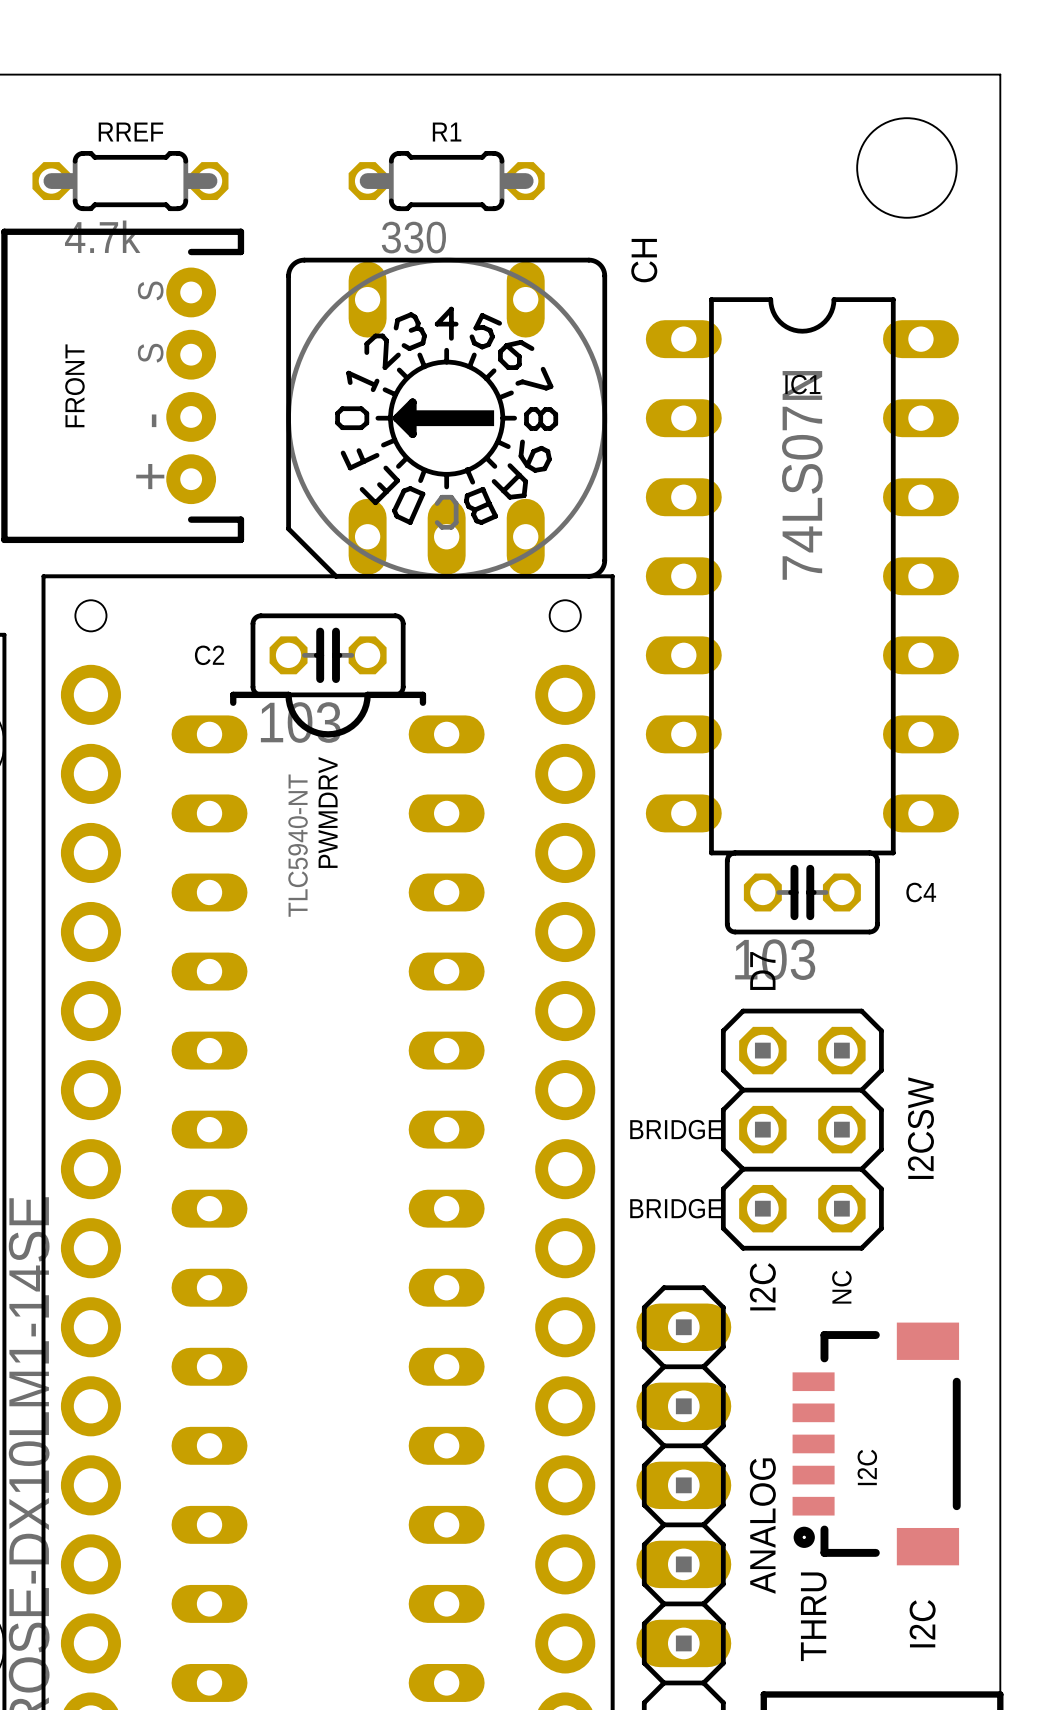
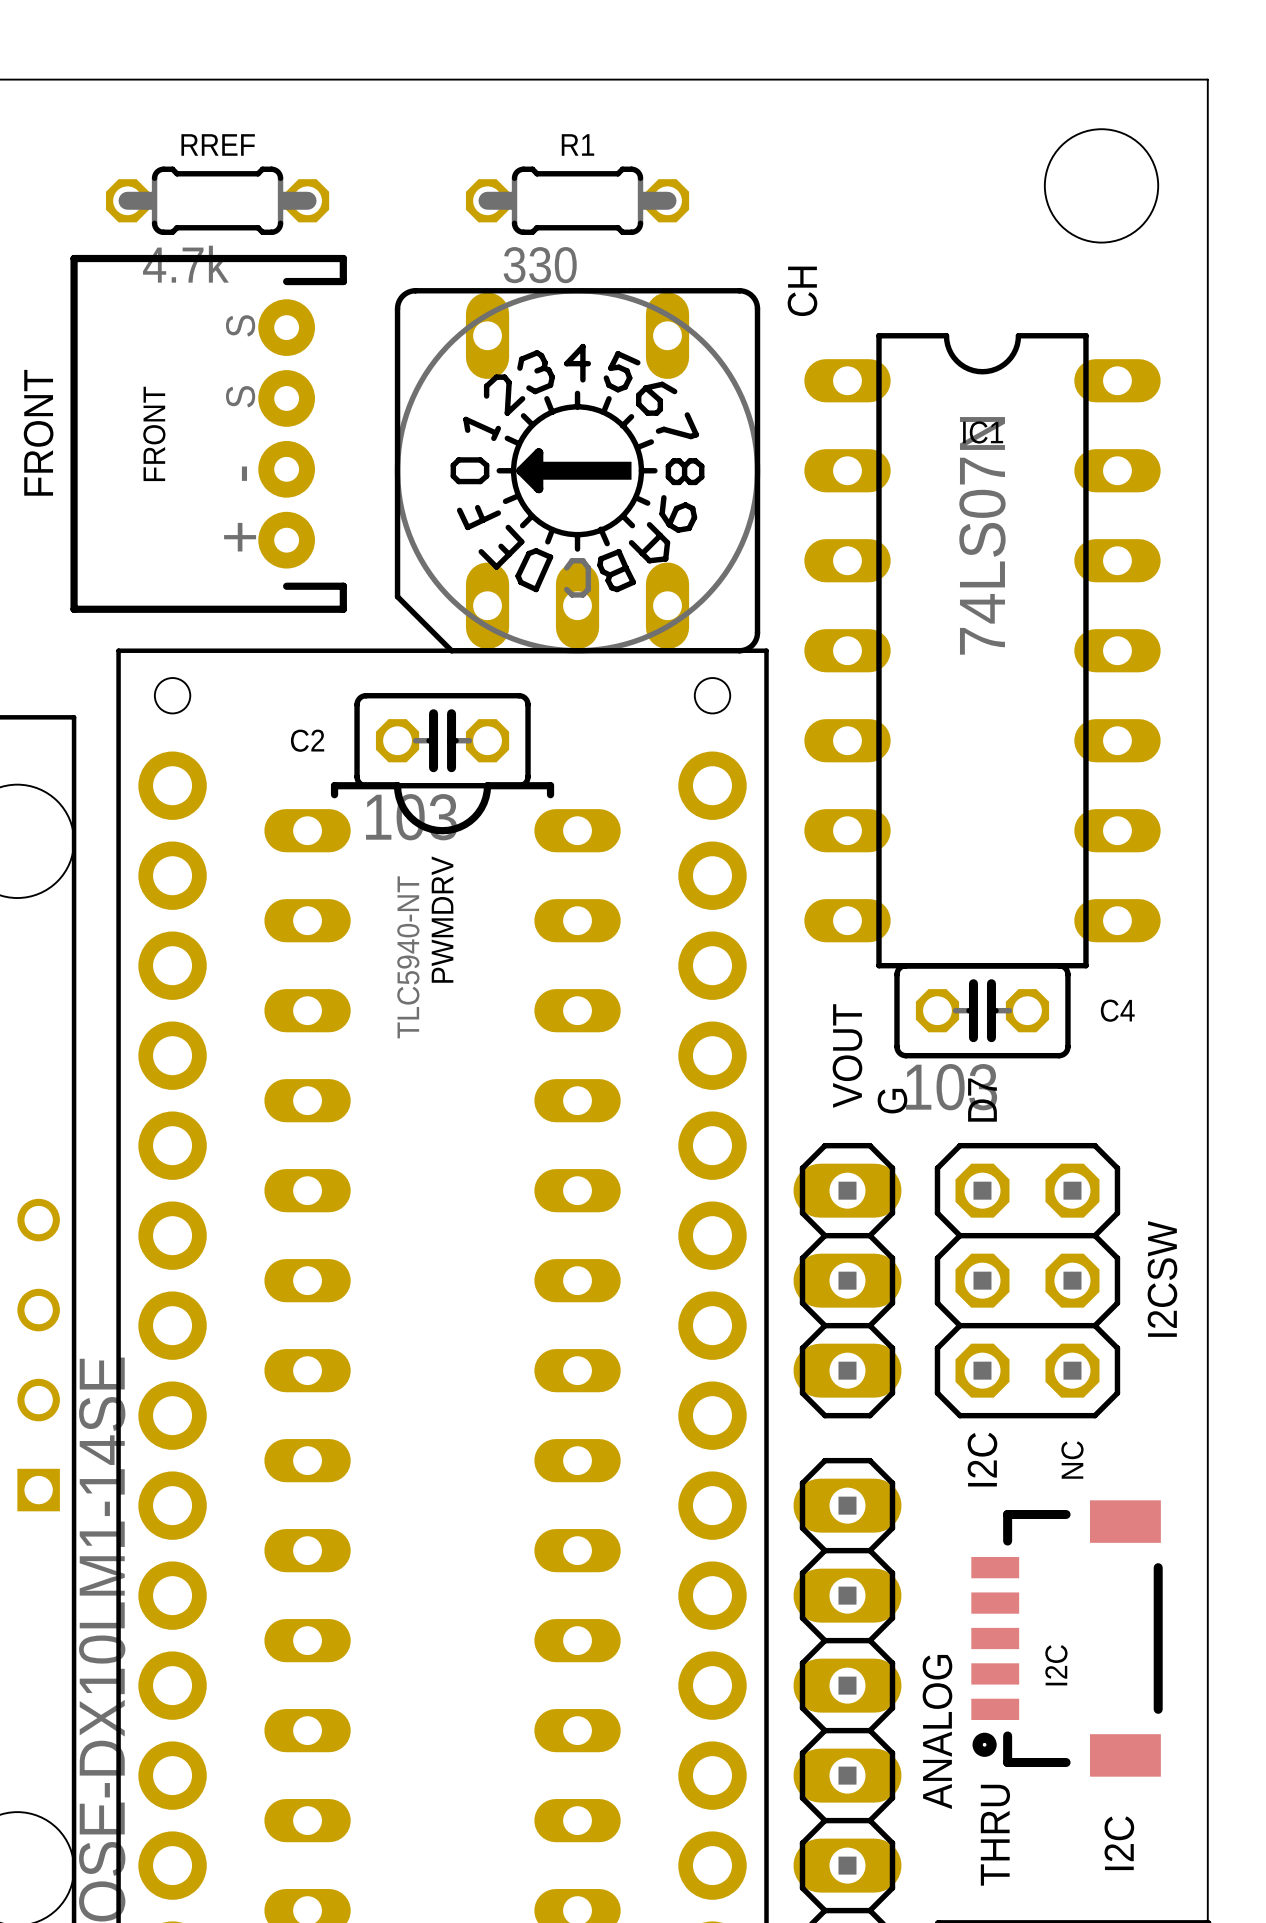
text: none -> G (892, 1101)
text position: D7 (762, 971) -> D7 (982, 1100)
text: BRIDGE (676, 1129) -> none
VOUT: none -> (847, 1280)
I2CSW position: (802, 1129) -> (1027, 1280)
text: BRIDGE (676, 1208) -> none
text position: I2C (762, 1286) -> I2C (982, 1459)
text position: NC (841, 1287) -> NC (1072, 1460)

